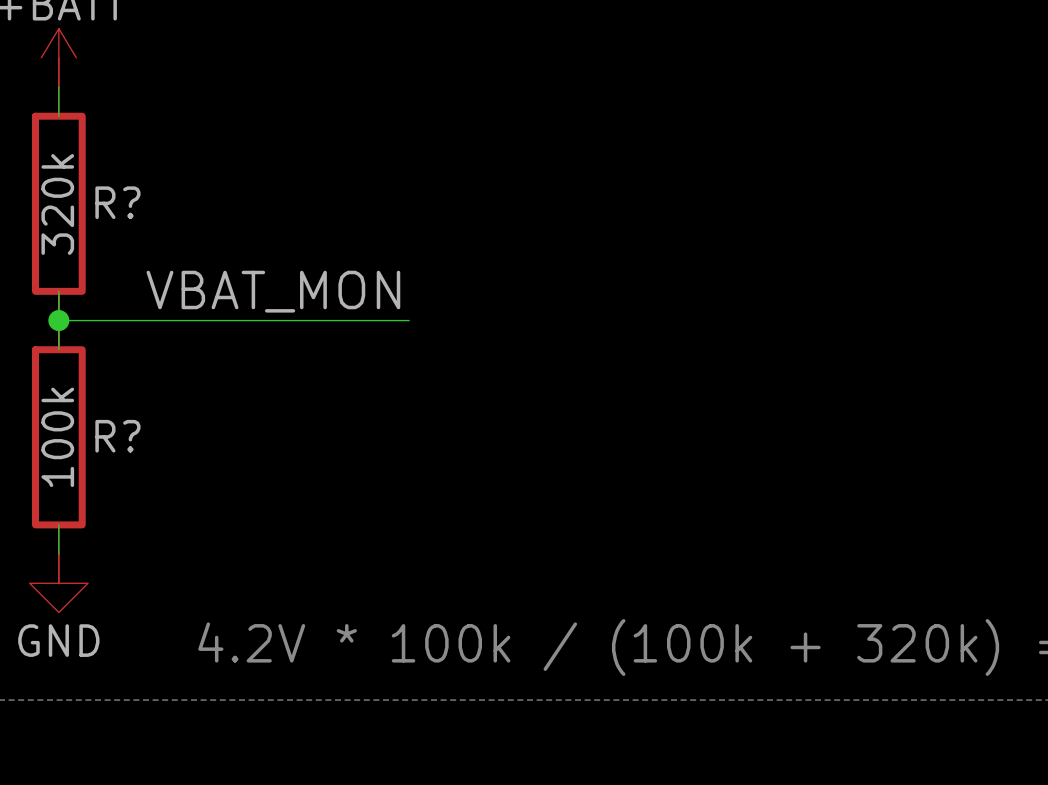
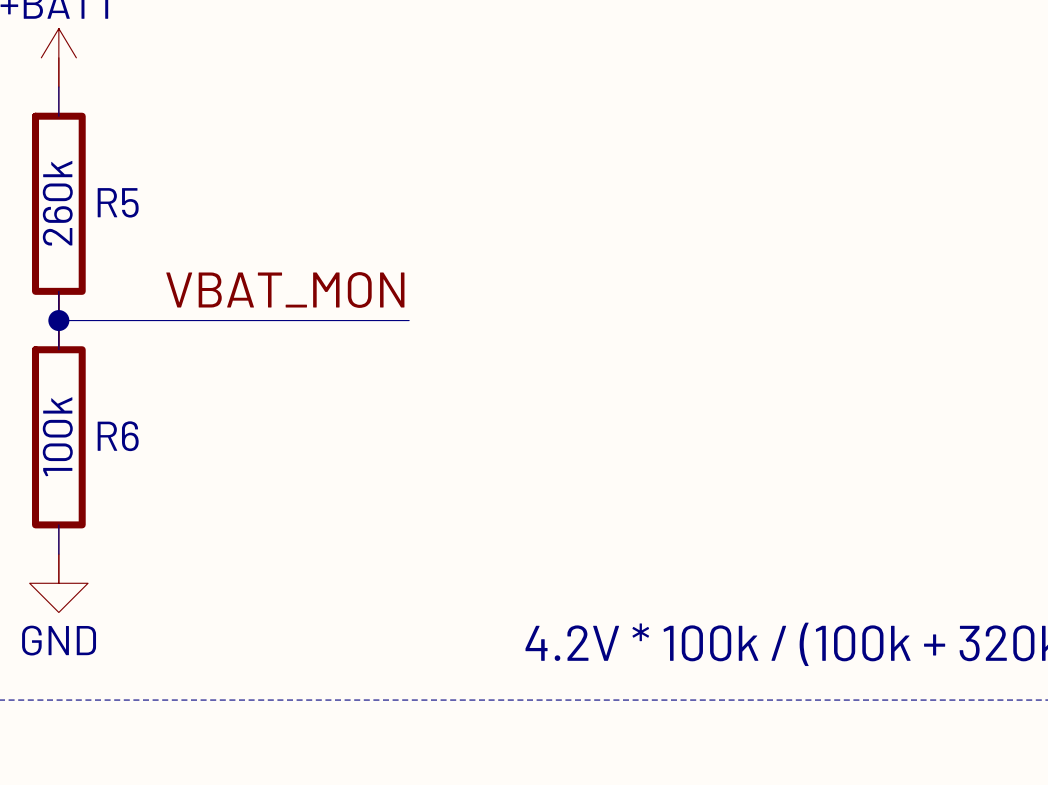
R? name: R? (117, 202) -> R5 (118, 202)
R? value: 320k (57, 204) -> 260k (57, 203)
R? name: R? (117, 436) -> R6 (118, 436)

